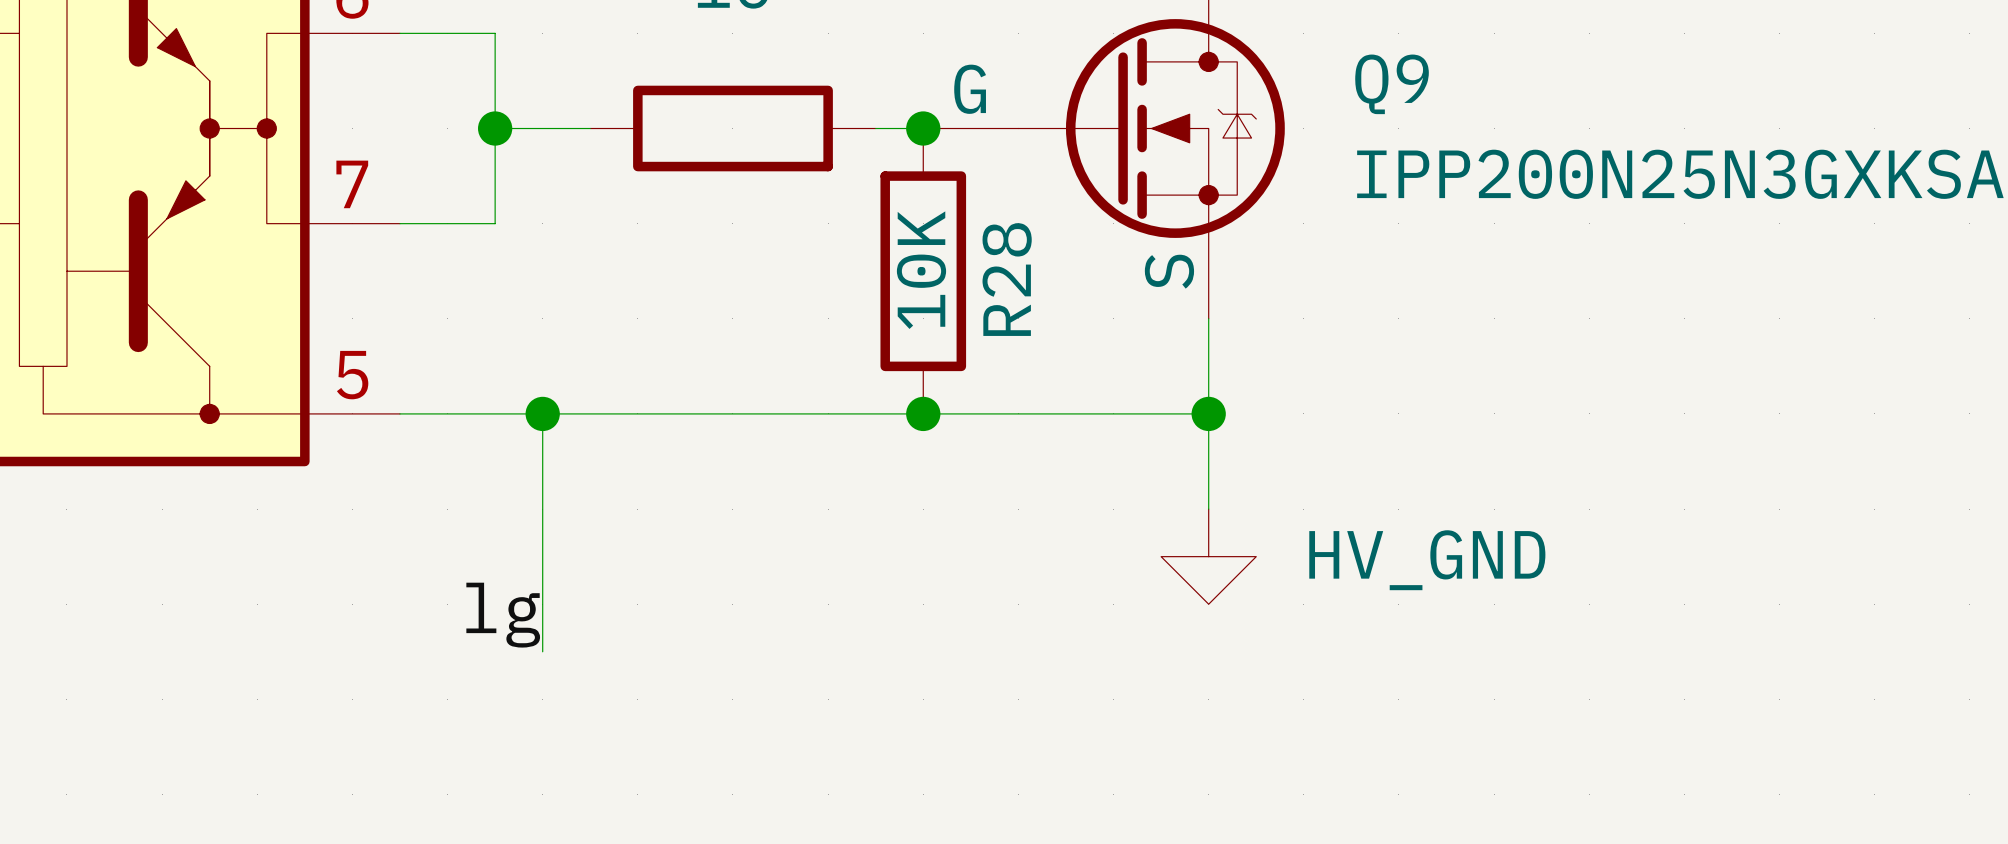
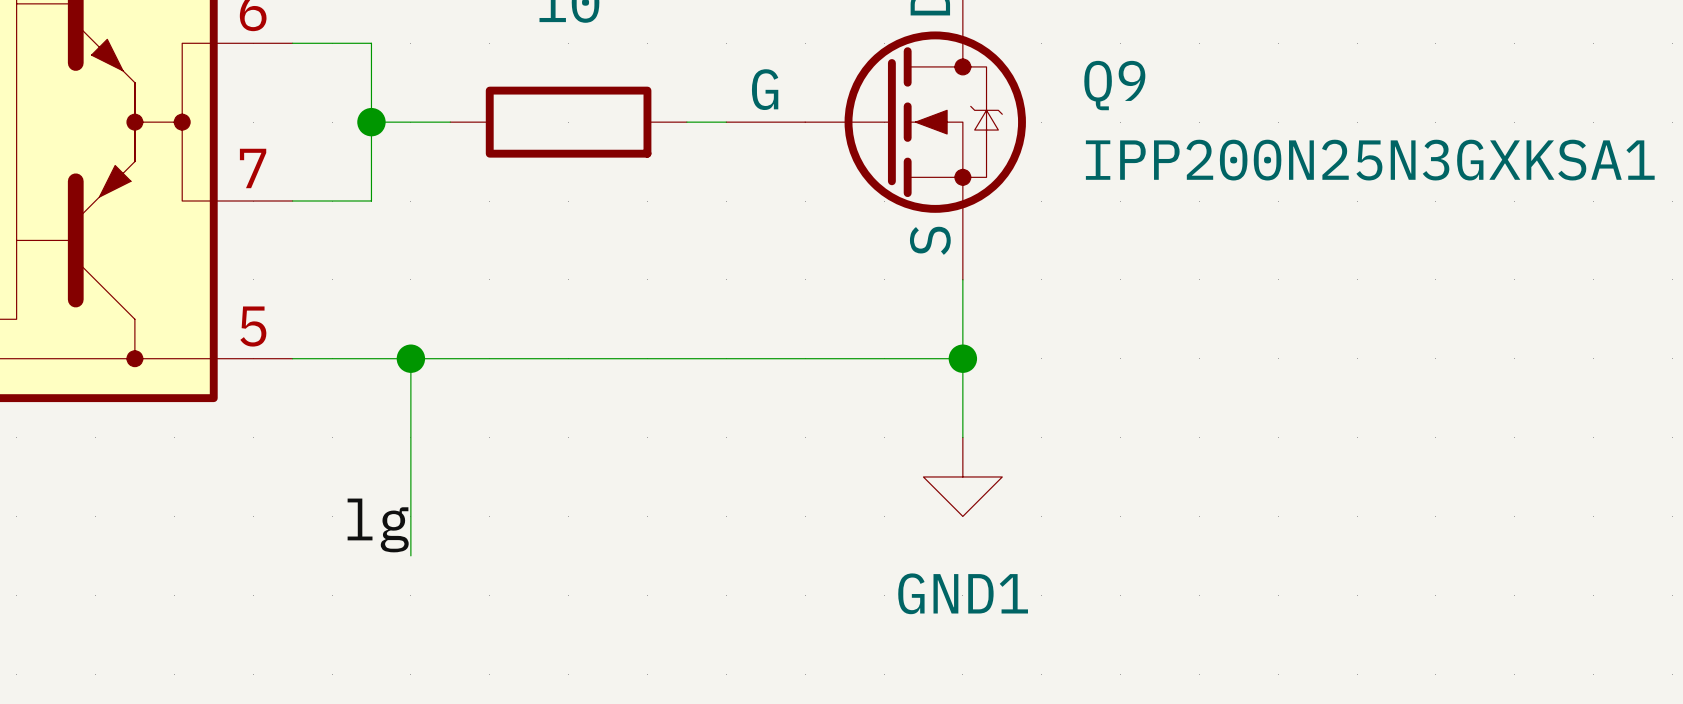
junction: (923, 128) -> none
R28: 10K (923, 271) -> none
junction: (923, 413) -> none
power symbol: HV_GND (1208, 556) -> GND1 (962, 476)

